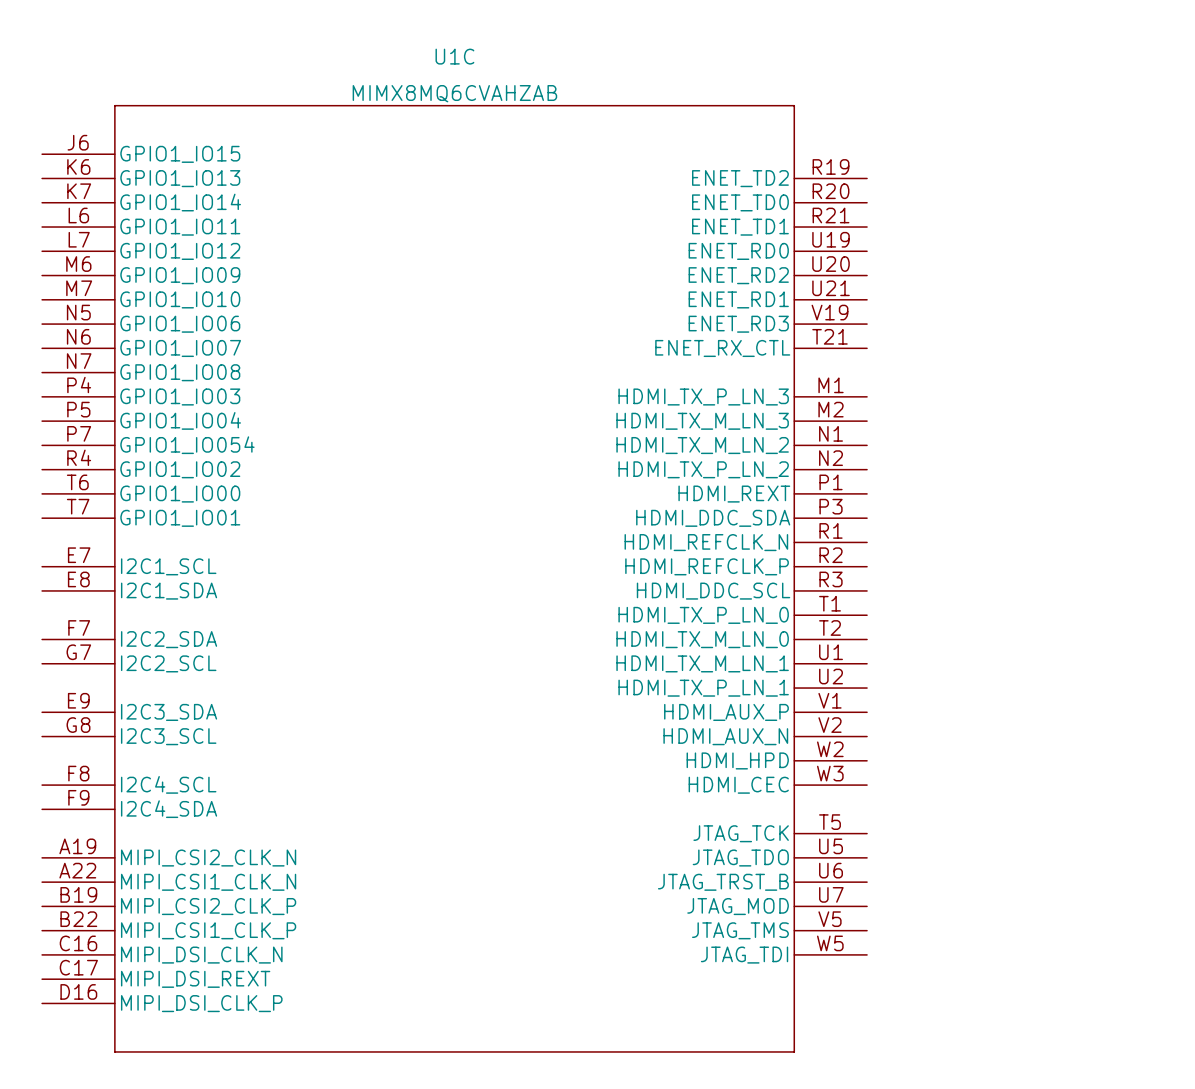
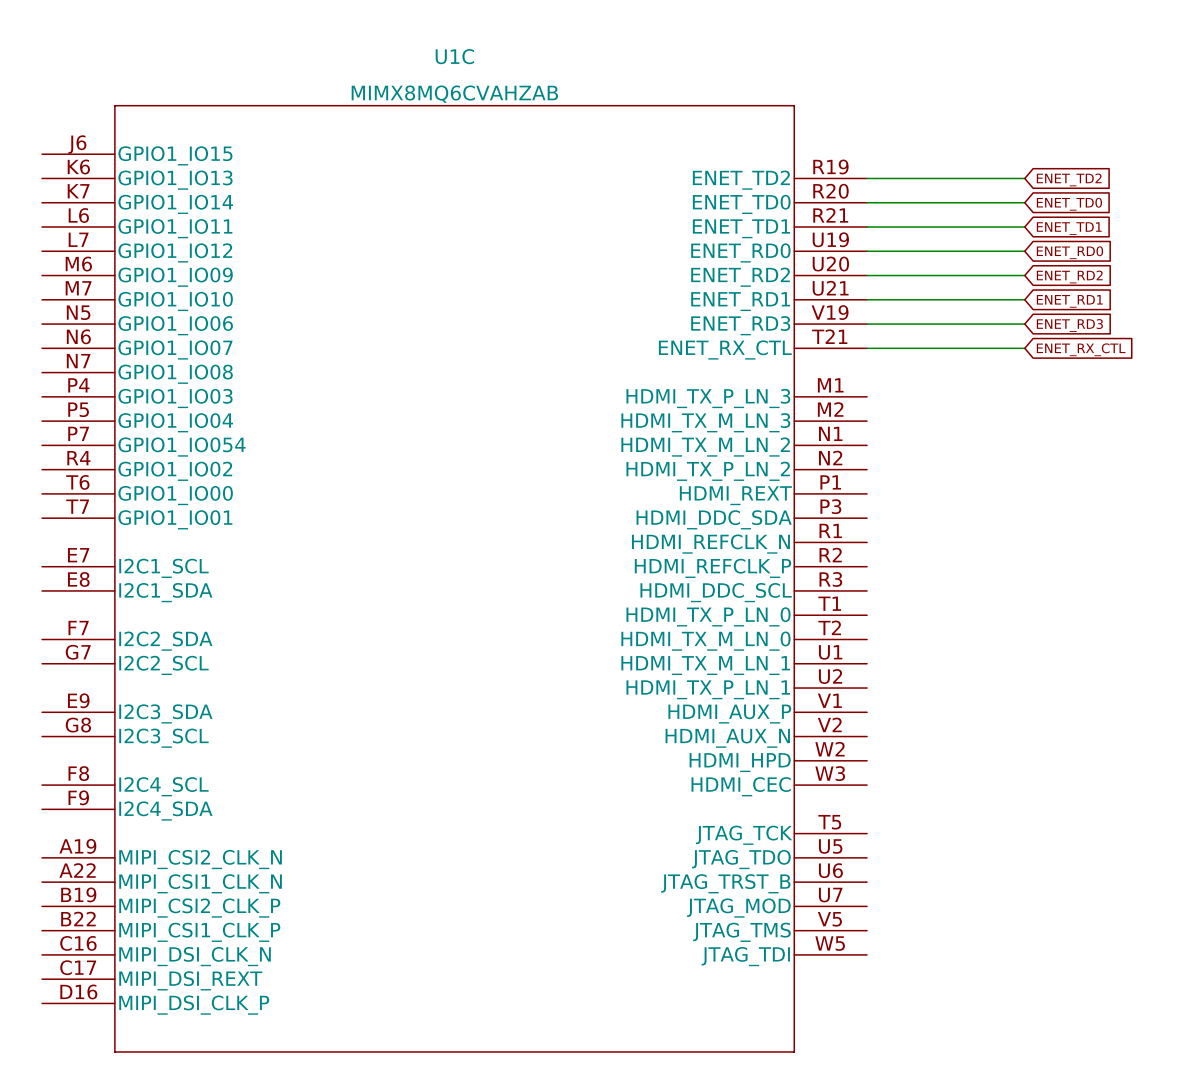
wire: none -> (867, 178) (1024, 178)
global label: none -> ENET_TD2 (1069, 179)
wire: none -> (867, 202) (1024, 202)
global label: none -> ENET_TD0 (1069, 204)
wire: none -> (867, 227) (1024, 227)
global label: none -> ENET_TD1 (1069, 228)
wire: none -> (867, 251) (1024, 251)
global label: none -> ENET_RD0 (1069, 252)
wire: none -> (867, 275) (1024, 275)
global label: none -> ENET_RD2 (1069, 276)
wire: none -> (867, 299) (1024, 299)
global label: none -> ENET_RD1 (1069, 301)
wire: none -> (867, 324) (1024, 324)
global label: none -> ENET_RD3 (1069, 325)
wire: none -> (867, 348) (1024, 348)
global label: none -> ENET_RX_CTL (1081, 349)

